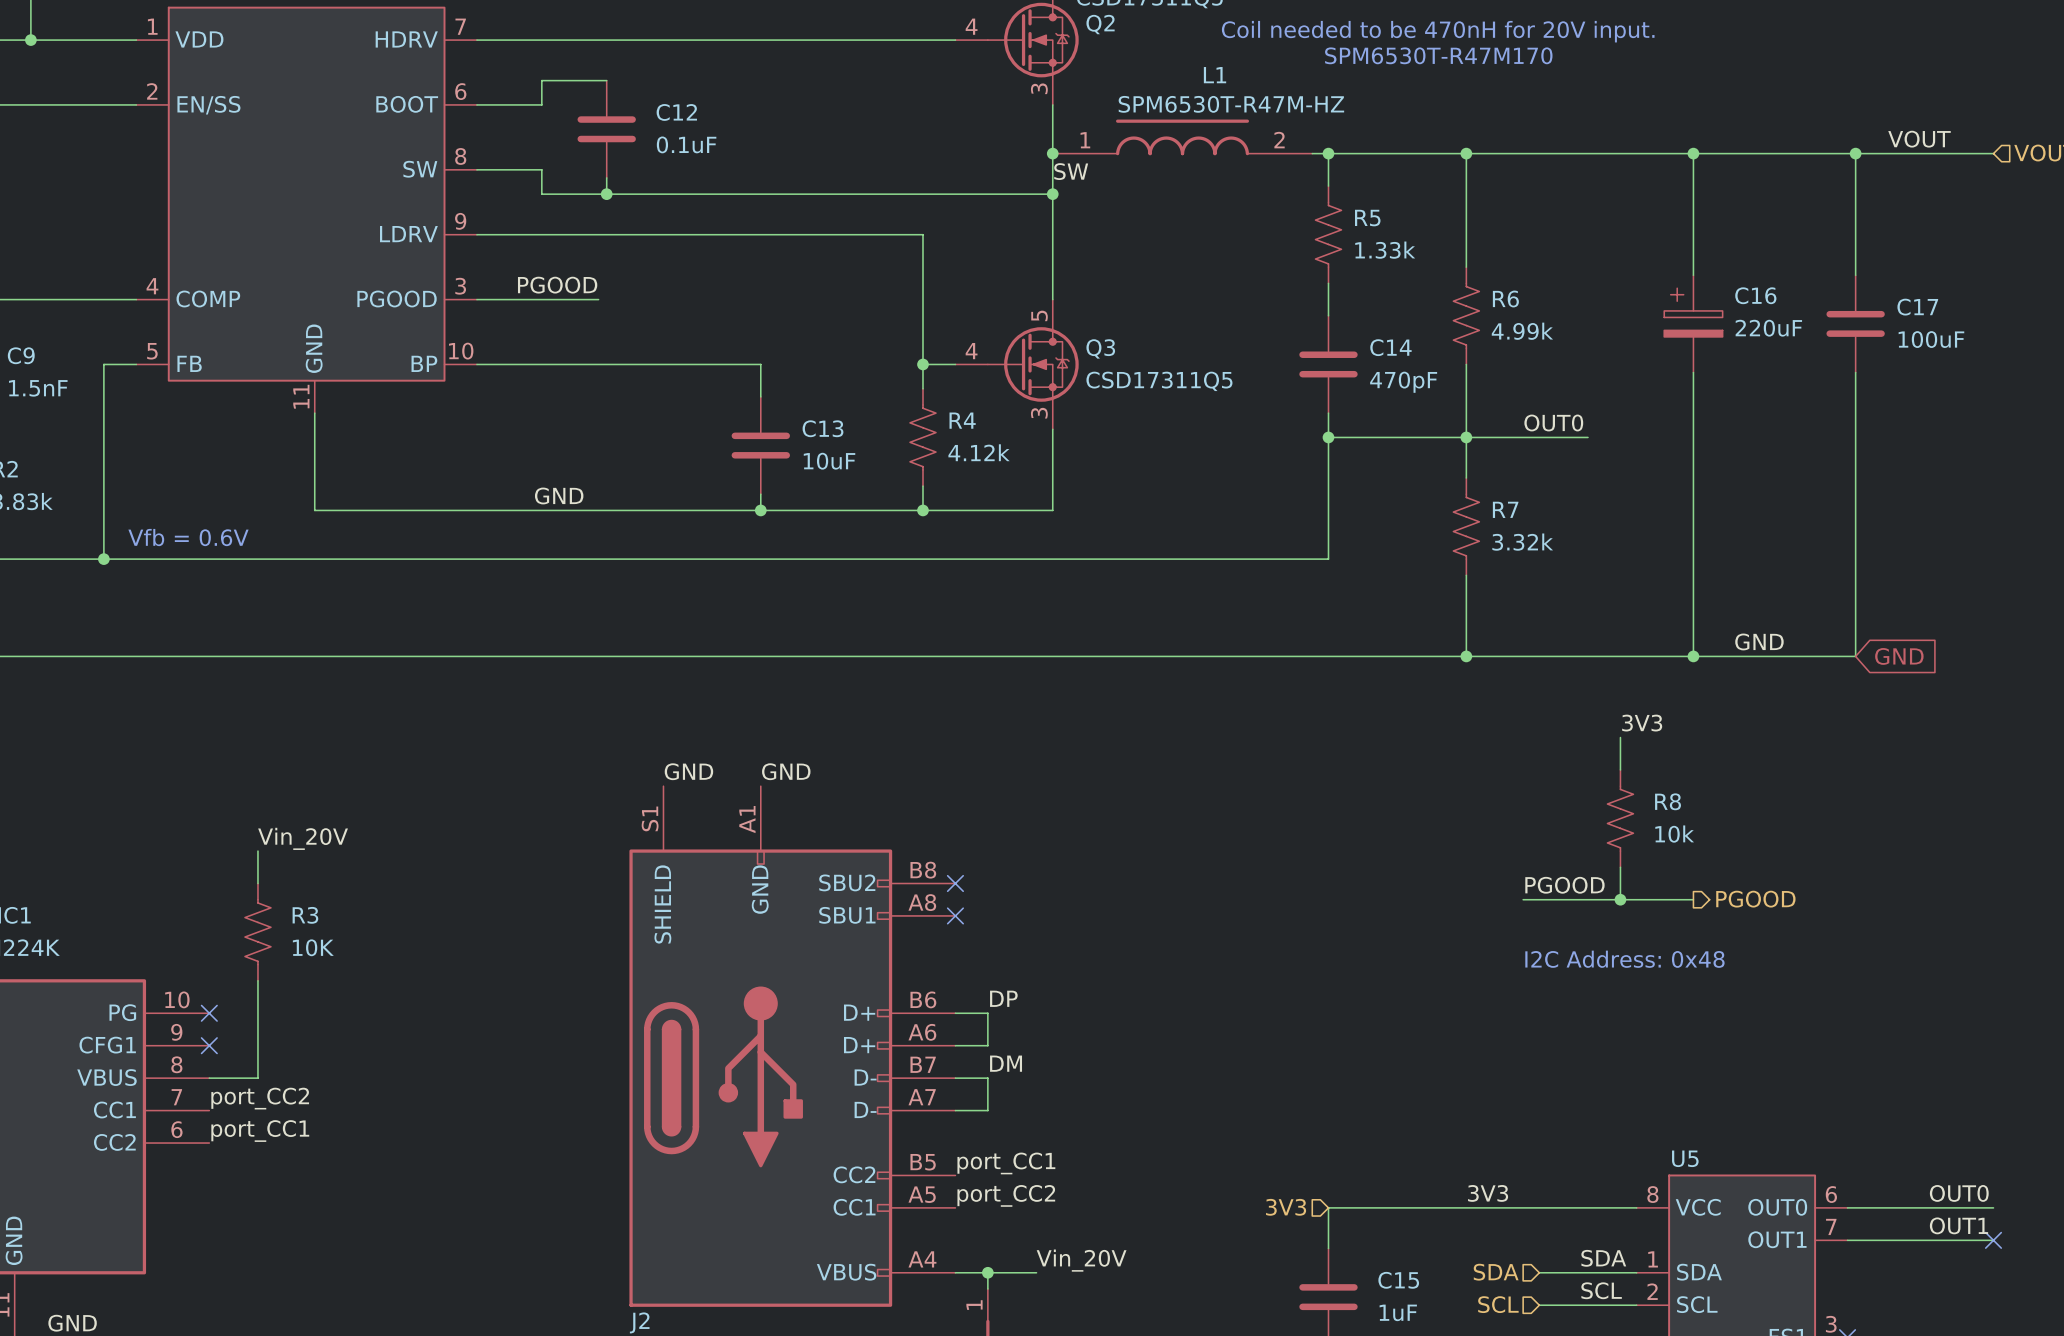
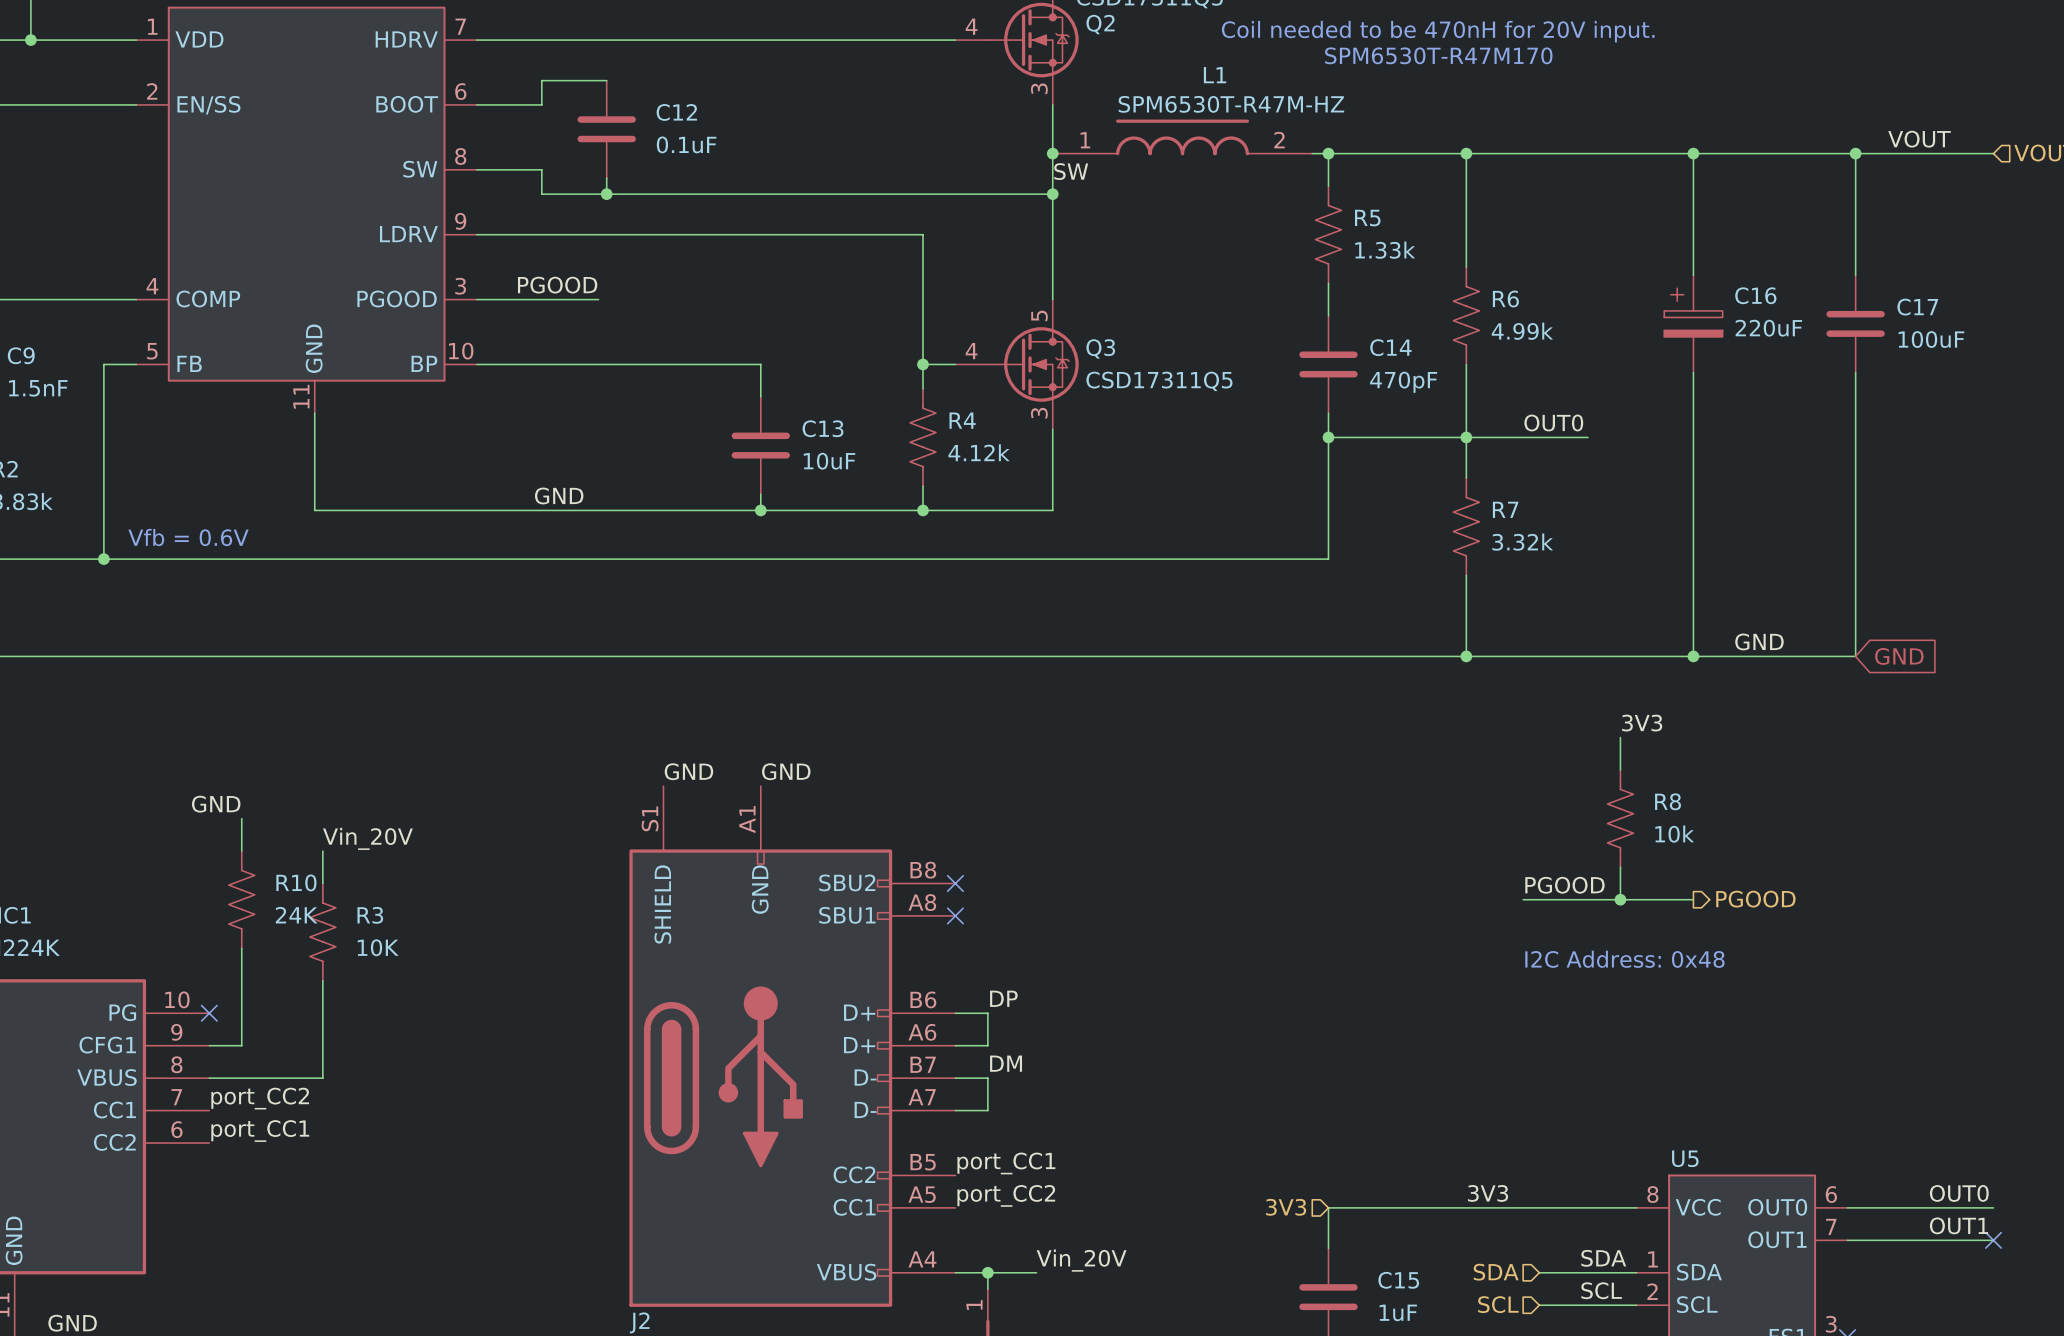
label: none -> GND (216, 804)
label position: Vin_20V (303, 838) -> Vin_20V (367, 838)
wire: (257, 851) (257, 883) -> (241, 818) (241, 851)
wire: none -> (322, 851) (322, 883)
R10: none -> 24K (241, 899)
R3 position: (257, 932) -> (322, 932)
wire: none -> (241, 948) (241, 1045) (209, 1045)
wire: (257, 980) (257, 1078) -> (322, 980) (322, 1078) (257, 1078)
no-connect mark: (209, 1045) -> none

